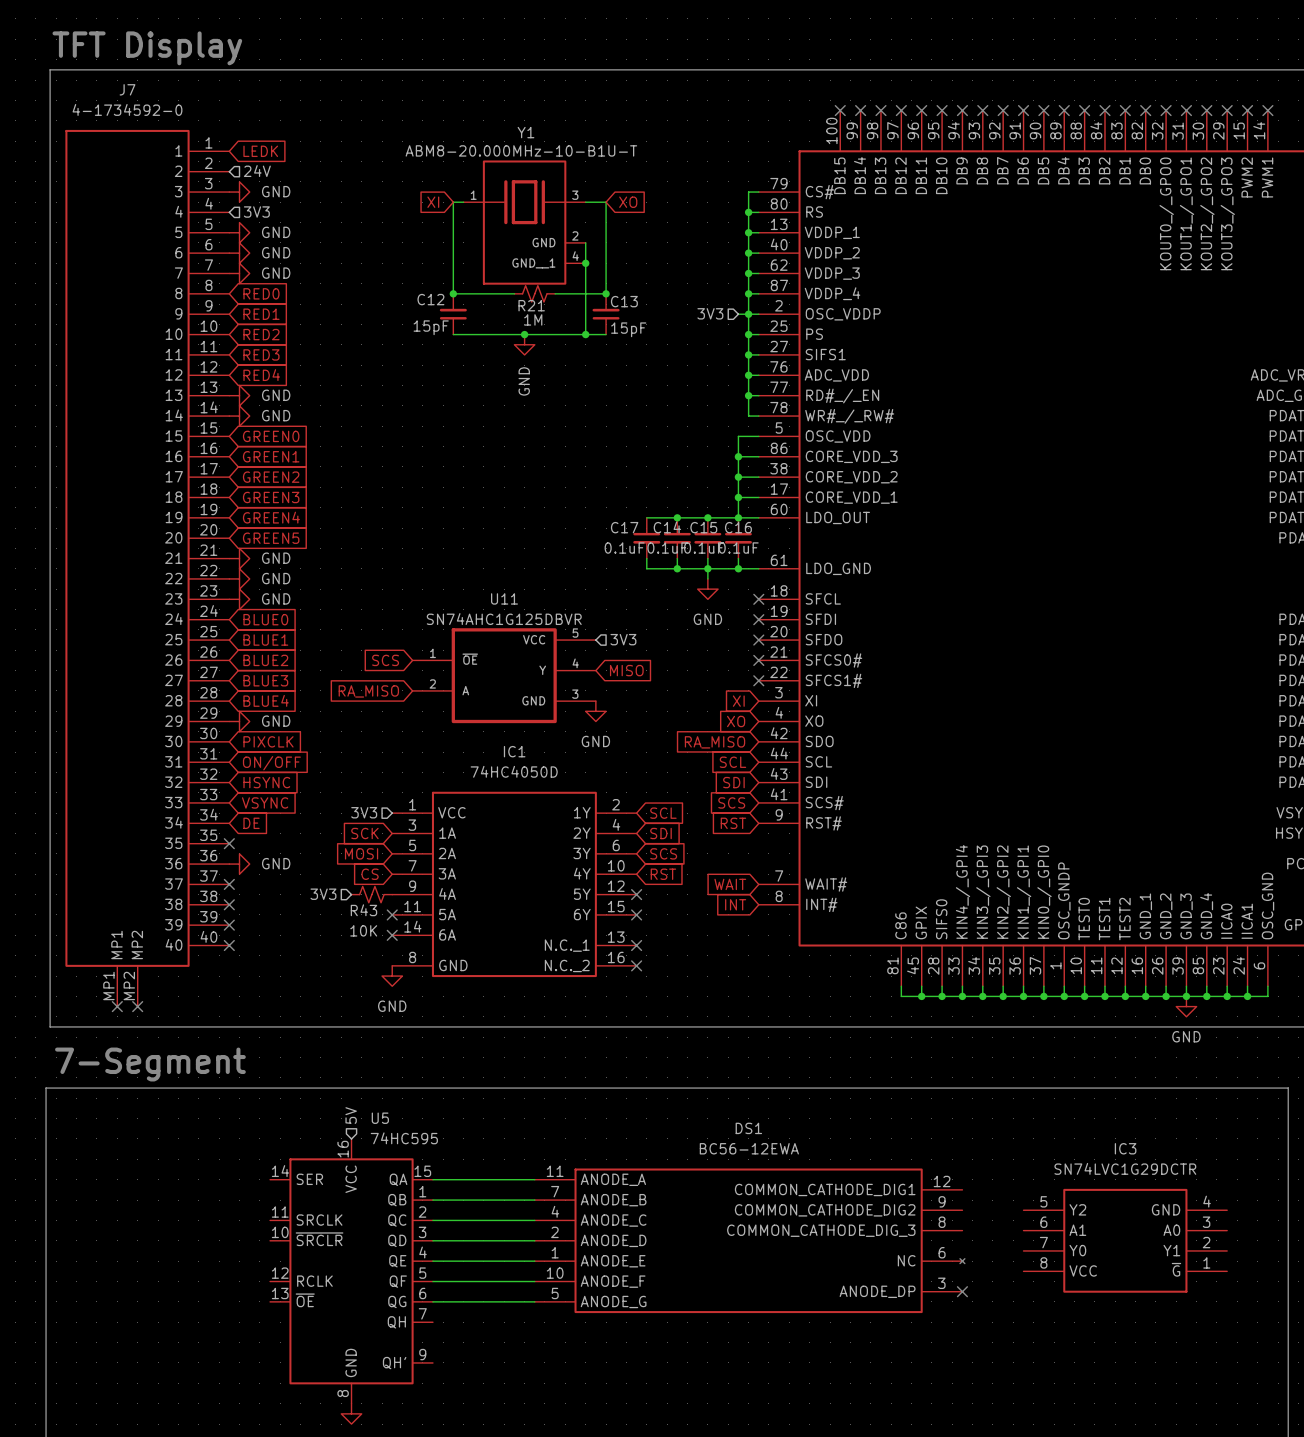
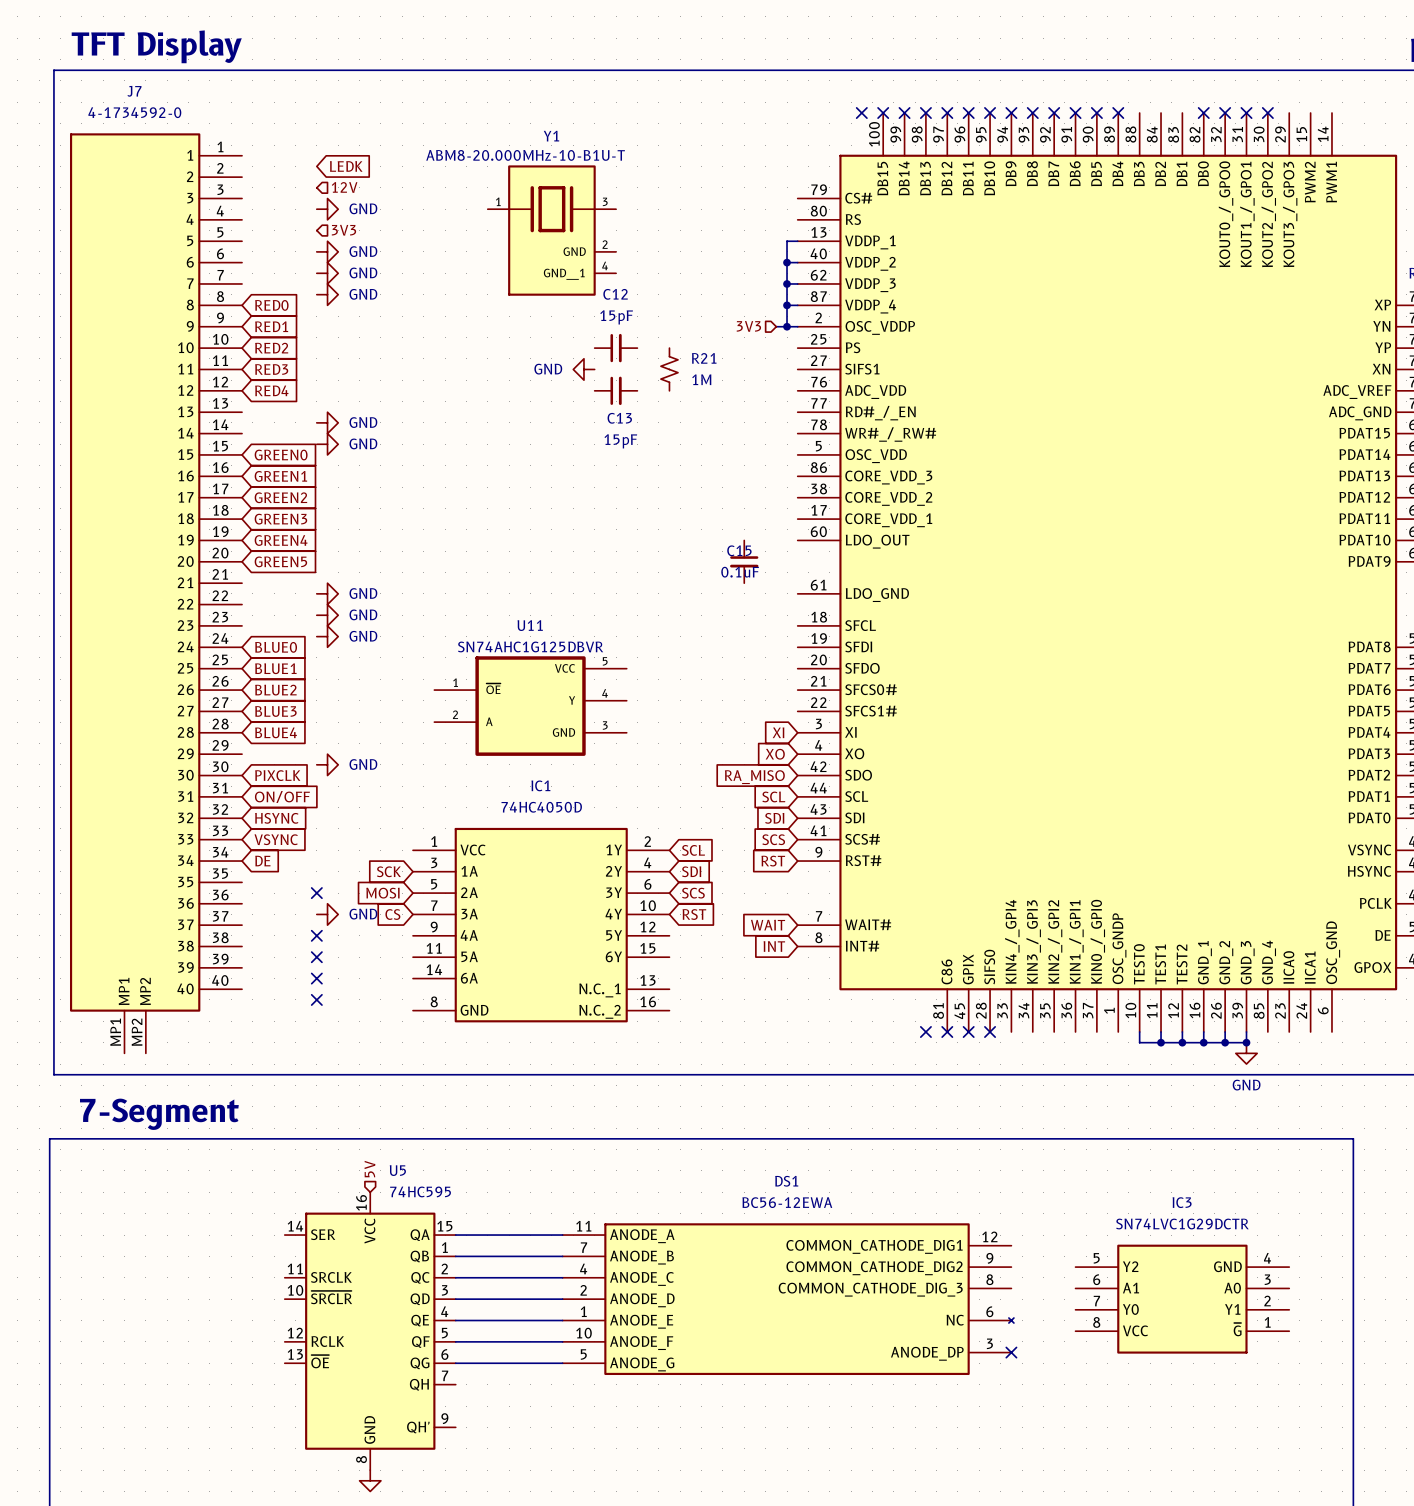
no-connect mark: none -> (861, 113)
no-connect mark: (1084, 110) -> none
no-connect mark: (1104, 110) -> none
no-connect mark: (1125, 110) -> none
no-connect mark: (1227, 110) -> none
no-connect mark: (1247, 110) -> none
no-connect mark: (1267, 110) -> none
global label position: LEDK (260, 151) -> LEDK (346, 166)
hierarchical label: 24V (257, 171) -> none
hierarchical label: none -> 12V (344, 187)
power symbol: GND (239, 192) -> none
wire: (758, 192) (748, 192) (748, 232) -> none
power symbol: none -> GND (327, 209)
global label: XI (433, 202) -> none
wire: (463, 202) (453, 202) (453, 293) (514, 293) -> none
wire: (585, 202) (606, 202) (606, 293) (555, 293) -> none
global label: XO (628, 202) -> none
hierarchical label position: 3V3 (256, 212) -> 3V3 (343, 230)
wire: (748, 212) (758, 212) -> none
junction: (748, 212) -> none
power symbol: GND (239, 232) -> none
junction: (748, 232) -> none
power symbol: none -> GND (327, 251)
wire: (585, 242) (585, 334) -> none
power symbol: GND (239, 253) -> none
power symbol: none -> GND (327, 273)
junction: (585, 263) -> none
power symbol: GND (239, 273) -> none
power symbol: none -> GND (327, 294)
junction: (453, 293) -> none
R21 rotation: 0° (534, 293) -> 90° clockwise (669, 369)
R21 position: (534, 293) -> (669, 369)
junction: (606, 293) -> none
C12 name position: C12 (430, 299) -> C12 (615, 294)
R21 name position: R21 (531, 305) -> R21 (704, 358)
C12 rotation: 0° (453, 314) -> 90° clockwise (616, 348)
C12 position: (453, 314) -> (616, 348)
C13 rotation: 0° (606, 314) -> 90° clockwise (616, 390)
C13 position: (606, 314) -> (616, 390)
wire: (748, 314) (748, 416) (758, 416) -> none
R21 value position: 1M (533, 319) -> 1M (701, 379)
C13 value position: 15pF (628, 329) -> 15pF (620, 441)
wire: (453, 334) (606, 334) -> none
junction: (524, 334) -> none
junction: (585, 334) -> none
wire: (748, 334) (758, 334) -> none
junction: (748, 334) -> none
power symbol rotation: 0° (524, 344) -> 90° clockwise (583, 369)
power symbol position: GND (524, 344) -> GND (583, 369)
wire: (748, 354) (758, 354) -> none
junction: (748, 354) -> none
wire: (748, 375) (758, 375) -> none
junction: (748, 375) -> none
power symbol: GND (239, 395) -> none
wire: (748, 395) (758, 395) -> none
junction: (748, 395) -> none
power symbol: none -> GND (327, 422)
power symbol: GND (239, 416) -> none
power symbol: none -> GND (327, 444)
wire: (758, 436) (738, 436) (738, 517) -> none
wire: (738, 456) (758, 456) -> none
junction: (738, 456) -> none
wire: (738, 477) (758, 477) -> none
junction: (738, 477) -> none
wire: (738, 497) (758, 497) -> none
junction: (738, 497) -> none
wire: (646, 517) (758, 517) -> none
junction: (677, 517) -> none
junction: (707, 517) -> none
junction: (738, 517) -> none
C17: 0.1uF (646, 538) -> none
C14: 0.1uF (677, 538) -> none
C16: 0.1uF (738, 538) -> none
power symbol: GND (239, 558) -> none
wire: (646, 558) (646, 568) (758, 568) -> none
wire: (677, 558) (677, 568) -> none
wire: (707, 558) (707, 578) -> none
wire: (738, 558) (738, 568) -> none
power symbol: none -> GND (327, 593)
junction: (677, 568) -> none
junction: (707, 568) -> none
junction: (738, 568) -> none
power symbol: GND (239, 578) -> none
power symbol: none -> GND (327, 615)
power symbol: GND (707, 589) -> none
power symbol: GND (239, 599) -> none
no-connect mark: (758, 599) -> none
power symbol: none -> GND (327, 636)
no-connect mark: (758, 619) -> none
hierarchical label: 3V3 (623, 639) -> none
no-connect mark: (758, 640) -> none
global label: SCS (385, 660) -> none
no-connect mark: (758, 660) -> none
global label: MISO (626, 670) -> none
no-connect mark: (758, 680) -> none
global label: RA_MISO (368, 691) -> none
power symbol: GND (595, 711) -> none
power symbol: GND (239, 721) -> none
power symbol: none -> GND (327, 764)
hierarchical label: 3V3 (364, 812) -> none
no-connect mark: (229, 843) -> none
no-connect mark: none -> (316, 893)
power symbol: GND (239, 864) -> none
power symbol: none -> GND (327, 914)
no-connect mark: (229, 884) -> none
no-connect mark: none -> (316, 935)
hierarchical label: 3V3 (323, 894) -> none
R43: 10K (371, 894) -> none
no-connect mark: (636, 894) -> none
no-connect mark: (229, 904) -> none
no-connect mark: none -> (316, 957)
no-connect mark: (392, 914) -> none
no-connect mark: (636, 914) -> none
no-connect mark: (229, 925) -> none
no-connect mark: none -> (316, 978)
no-connect mark: (392, 935) -> none
no-connect mark: (229, 945) -> none
no-connect mark: (636, 945) -> none
no-connect mark: none -> (316, 999)
no-connect mark: (636, 965) -> none
power symbol: GND (392, 976) -> none
no-connect mark: none -> (925, 1031)
wire: (901, 986) (901, 996) (1084, 996) -> none
no-connect mark: none -> (947, 1031)
wire: (921, 986) (921, 996) -> none
no-connect mark: none -> (968, 1031)
wire: (942, 986) (942, 996) -> none
no-connect mark: none -> (990, 1031)
wire: (962, 986) (962, 996) -> none
wire: (982, 986) (982, 996) -> none
wire: (1003, 986) (1003, 996) -> none
wire: (1023, 986) (1023, 996) -> none
wire: (1043, 986) (1043, 996) -> none
wire: (1064, 986) (1064, 996) -> none
wire: (1206, 986) (1206, 996) -> none
wire: (1227, 986) (1227, 996) -> none
wire: (1247, 986) (1247, 996) -> none
wire: (1267, 986) (1267, 996) (1186, 996) -> none
junction: (921, 996) -> none
junction: (942, 996) -> none
junction: (962, 996) -> none
junction: (982, 996) -> none
junction: (1003, 996) -> none
junction: (1023, 996) -> none
junction: (1043, 996) -> none
junction: (1064, 996) -> none
junction: (1084, 996) -> none
junction: (1206, 996) -> none
junction: (1227, 996) -> none
junction: (1247, 996) -> none
no-connect mark: (117, 1006) -> none
no-connect mark: (137, 1006) -> none

